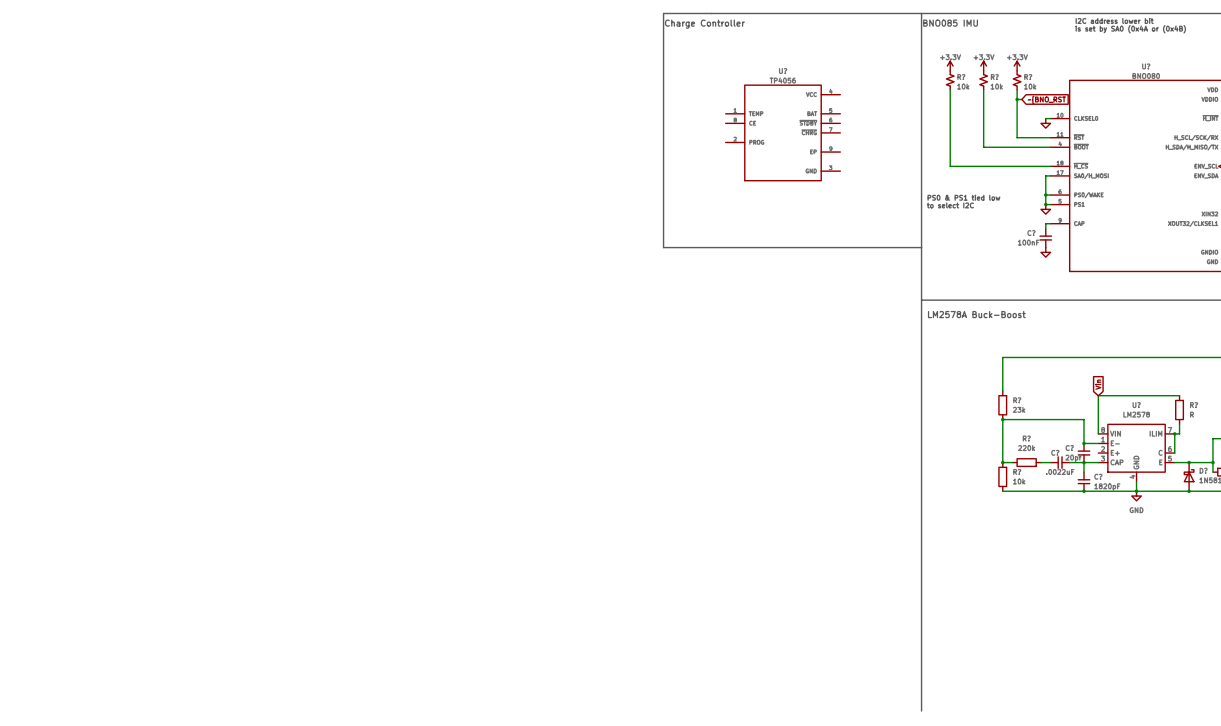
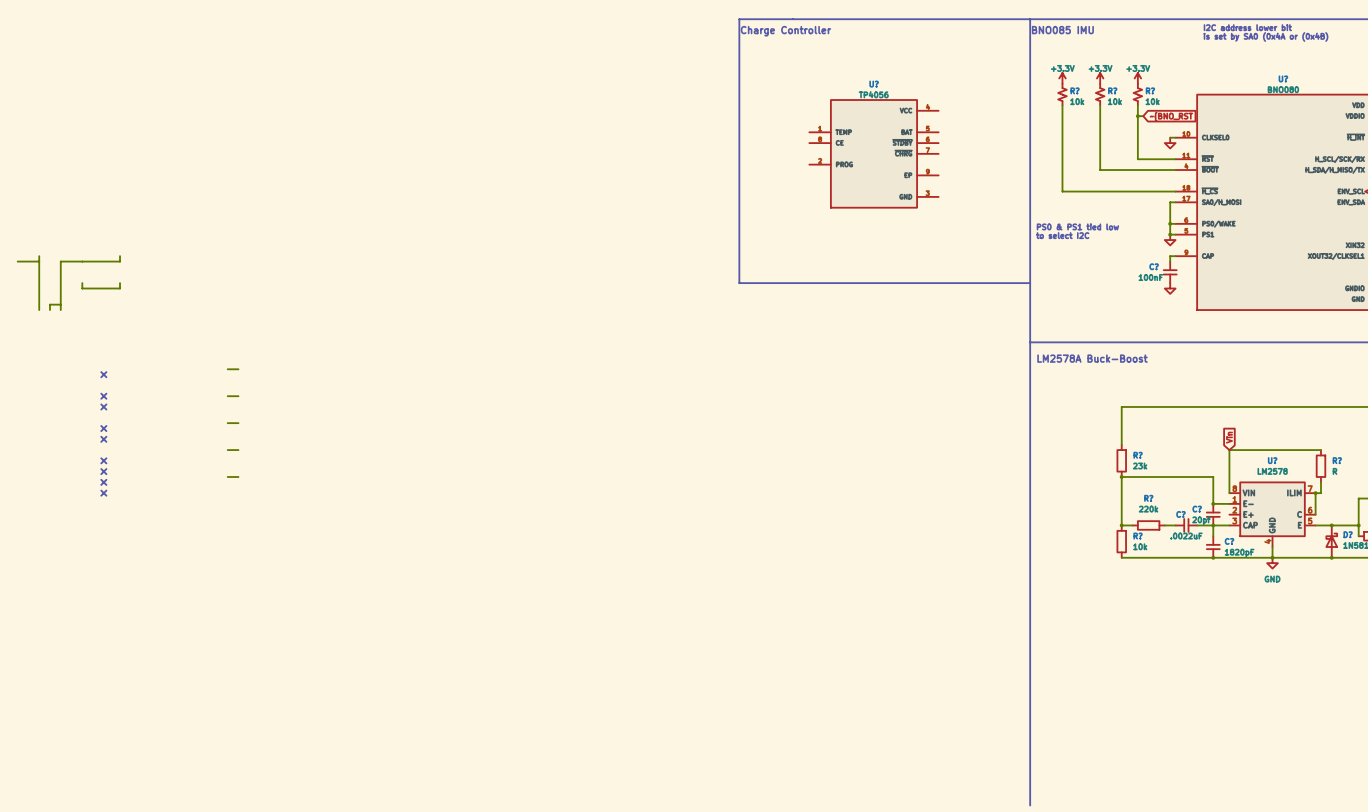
wire: none -> (39, 256) (39, 310)
wire: none -> (120, 256) (120, 261) (60, 261) (60, 310)
wire: none -> (17, 261) (39, 261)
wire: none -> (82, 283) (82, 288) (120, 288) (120, 283)
wire: none -> (60, 304) (50, 304) (50, 310)
wire: none -> (227, 369) (238, 369)
no-connect mark: none -> (103, 374)
no-connect mark: none -> (103, 396)
wire: none -> (227, 396) (238, 396)
no-connect mark: none -> (103, 406)
wire: none -> (227, 423) (238, 423)
no-connect mark: none -> (103, 428)
no-connect mark: none -> (103, 439)
wire: none -> (227, 450) (238, 450)
no-connect mark: none -> (103, 460)
no-connect mark: none -> (103, 471)
wire: none -> (227, 476) (238, 476)
no-connect mark: none -> (103, 482)
no-connect mark: none -> (103, 493)

